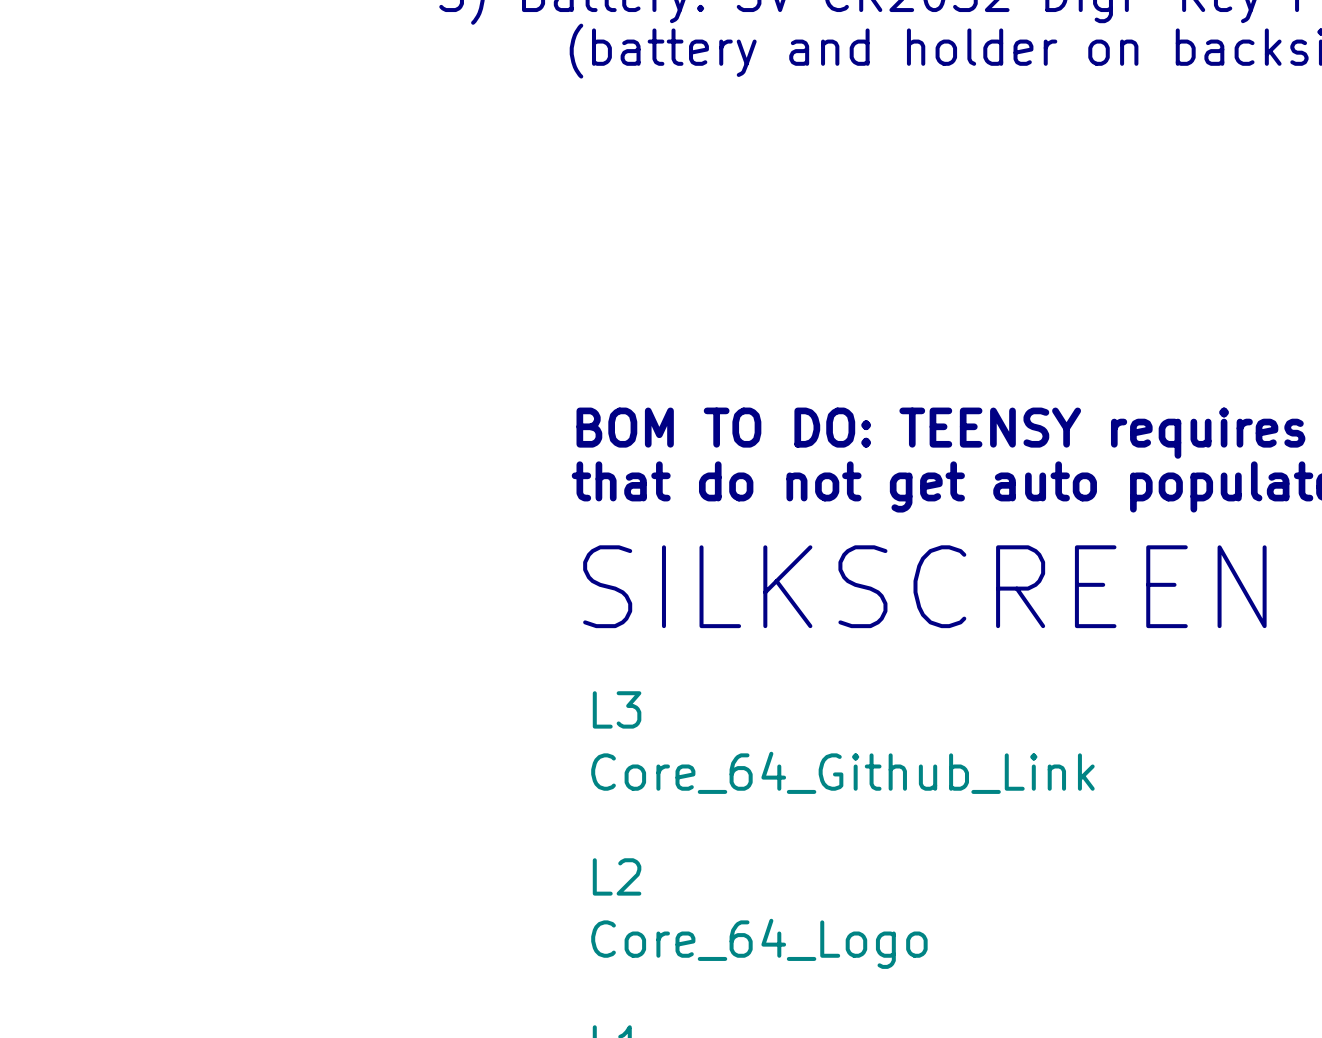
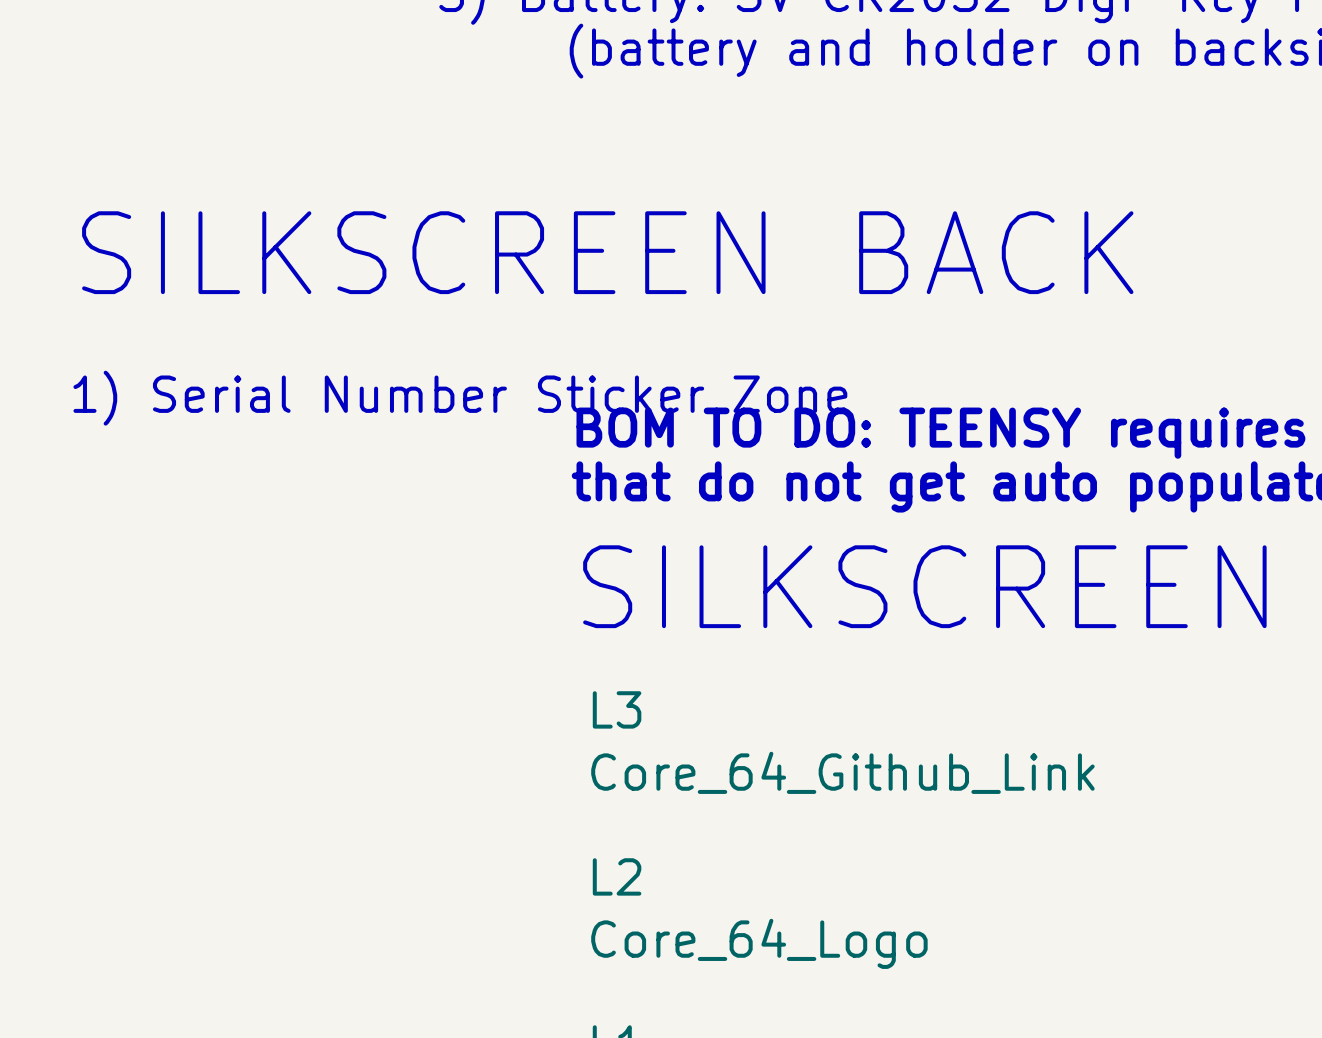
text: none -> SILKSCREEN BACK (607, 252)
text: none -> 1) Serial Number Sticker Zone (460, 398)

